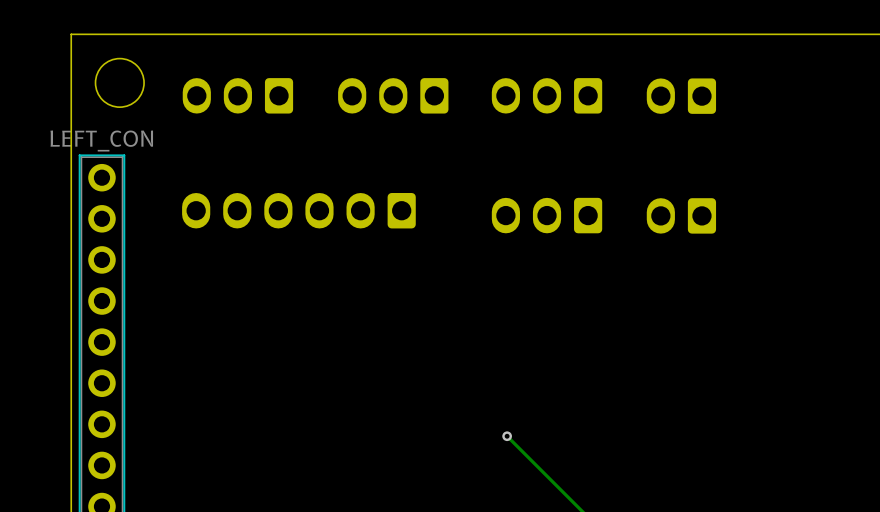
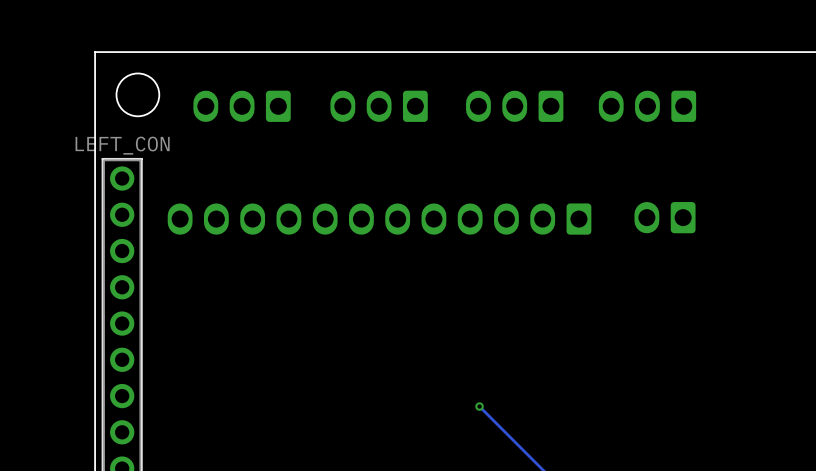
part footprint: [646, 78, 717, 114] -> [598, 90, 697, 122]
part: (298, 210) -> none
part: (547, 215) -> none
part position: (681, 215) -> (665, 217)
part: none -> (379, 219)

